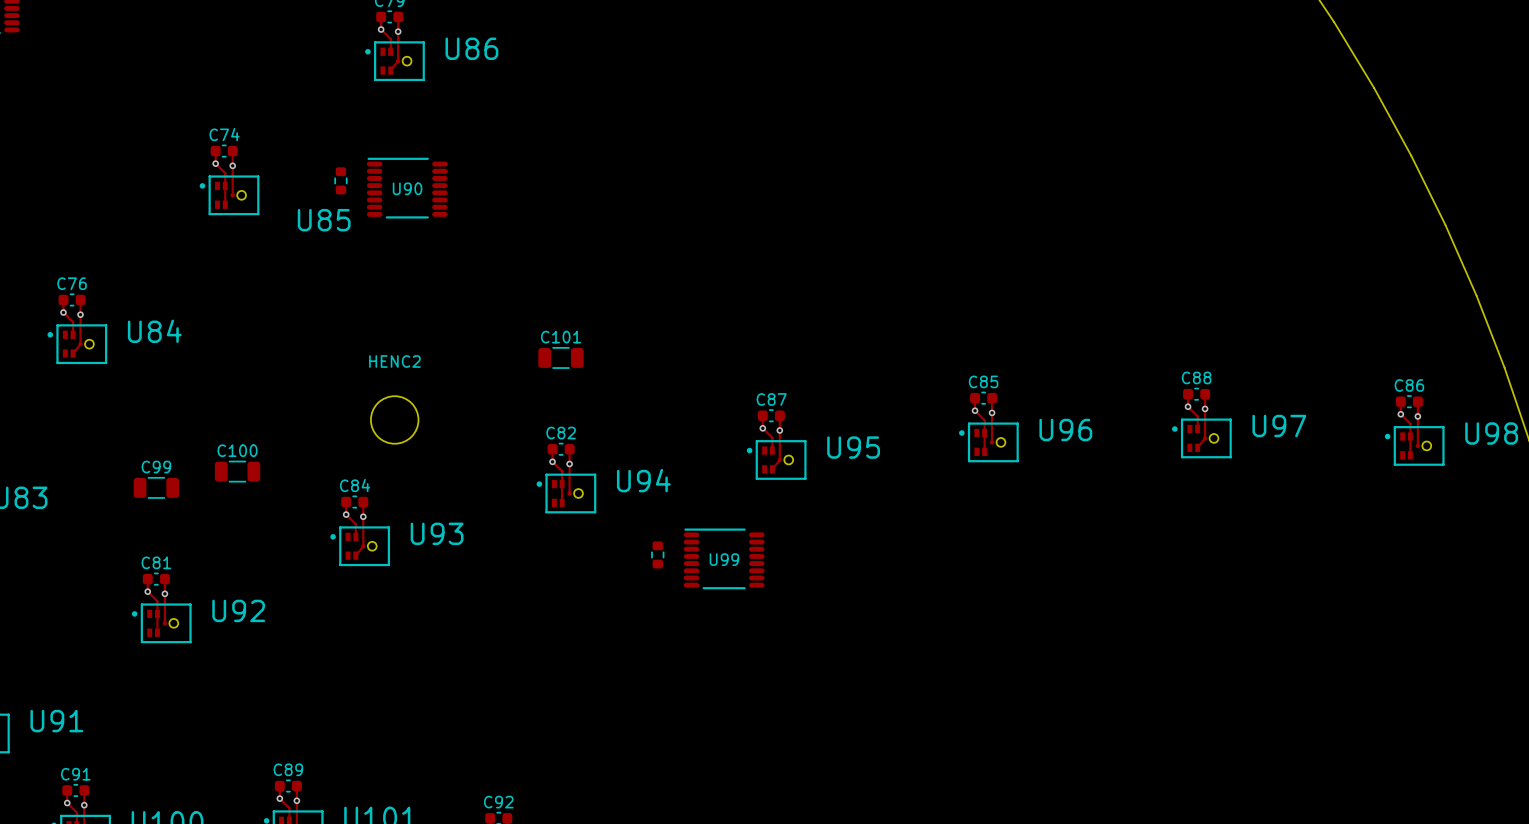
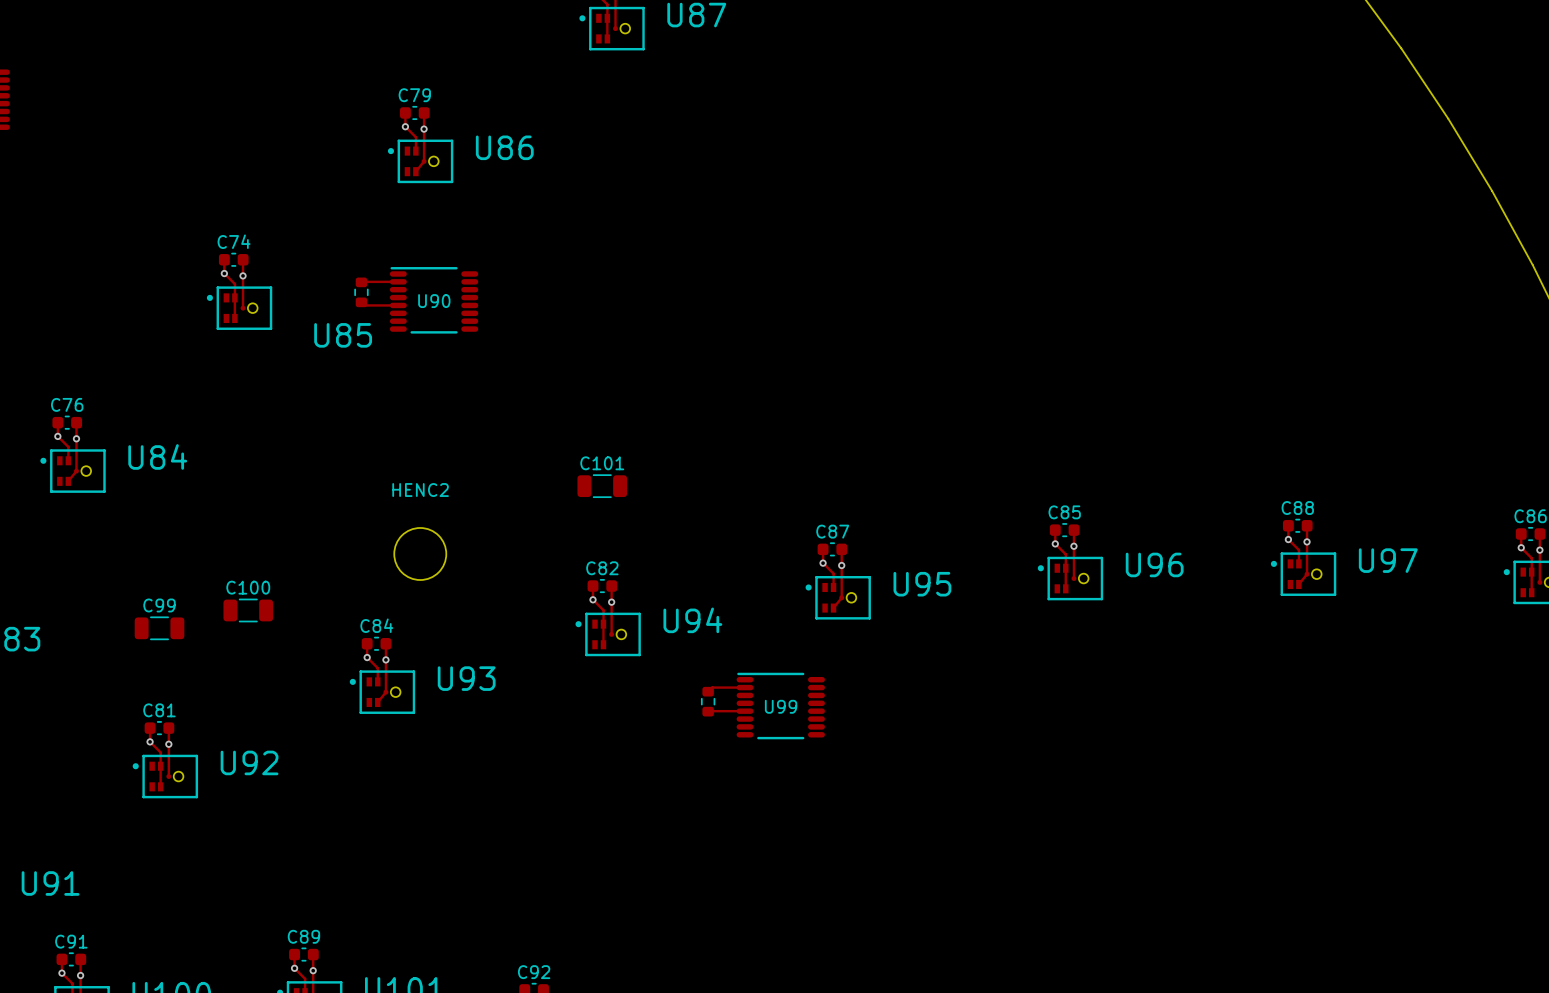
top track: none -> (398, 281) (361, 282)
top track: none -> (361, 302) (364, 305) (398, 305)
top track: none -> (745, 687) (712, 687) (708, 691)
top track: none -> (745, 711) (708, 711)

